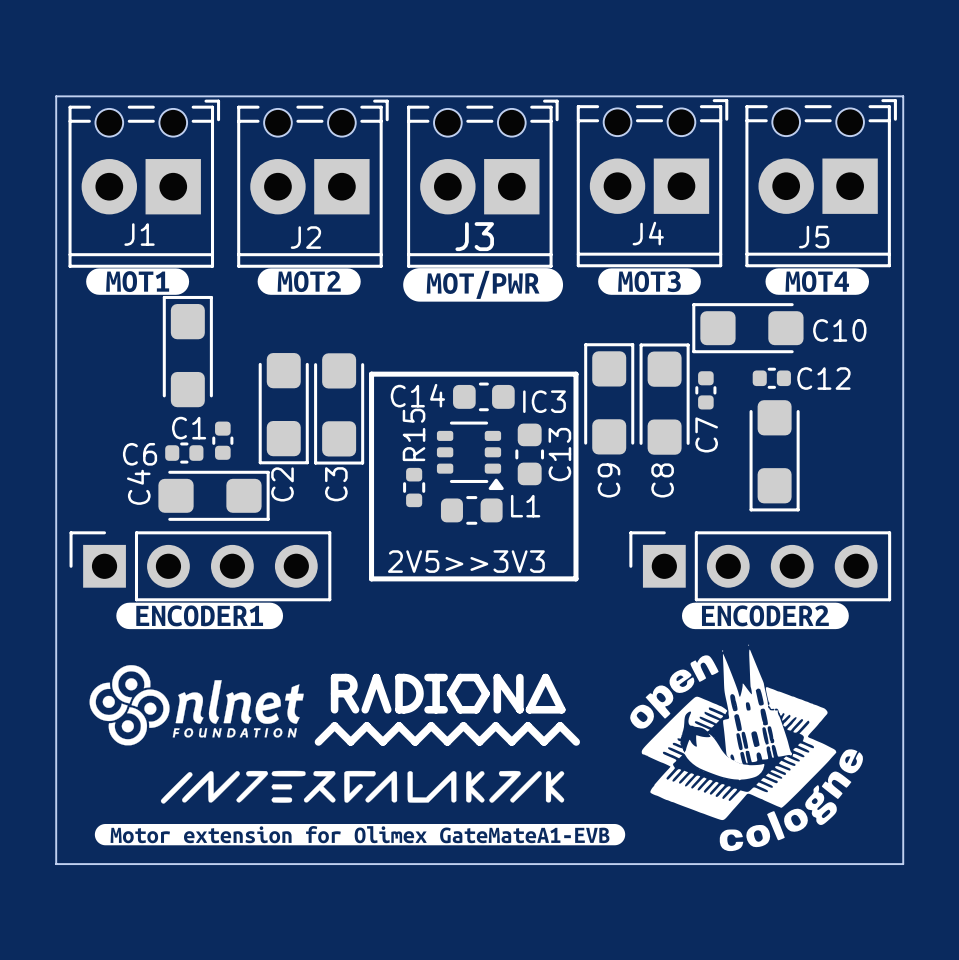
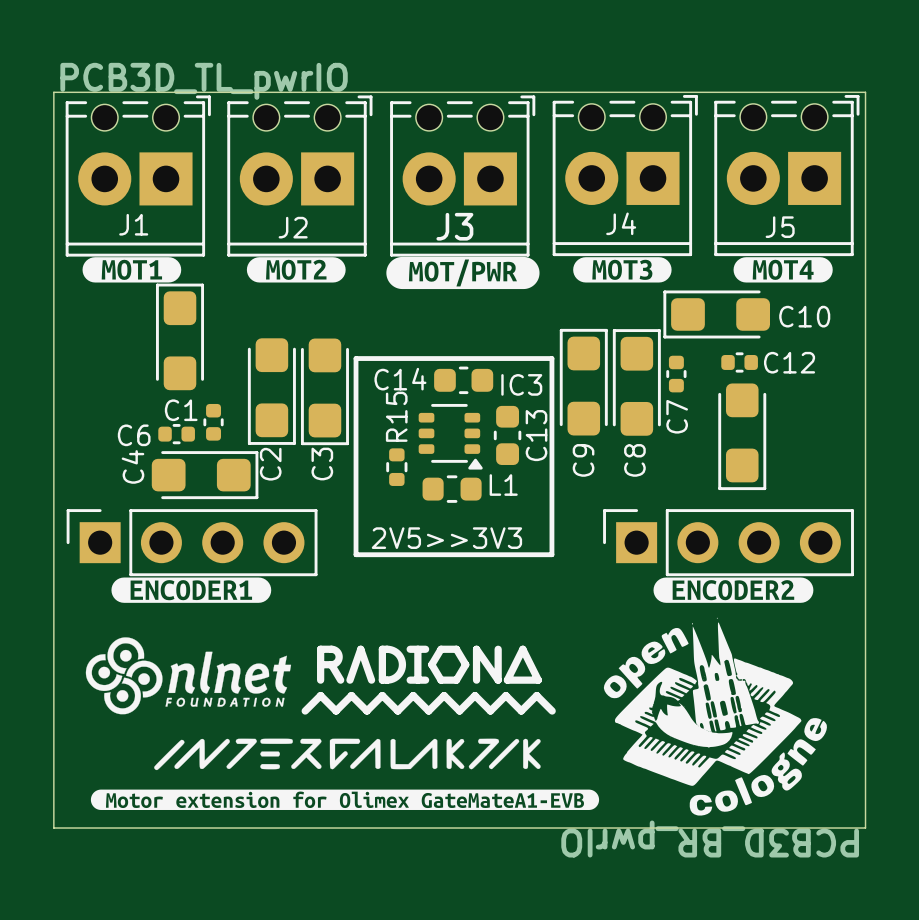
text: none -> PCB3D_TL_pwrIO (204, 81)
text: none -> PCB3D_BR_pwrIO (710, 839)

